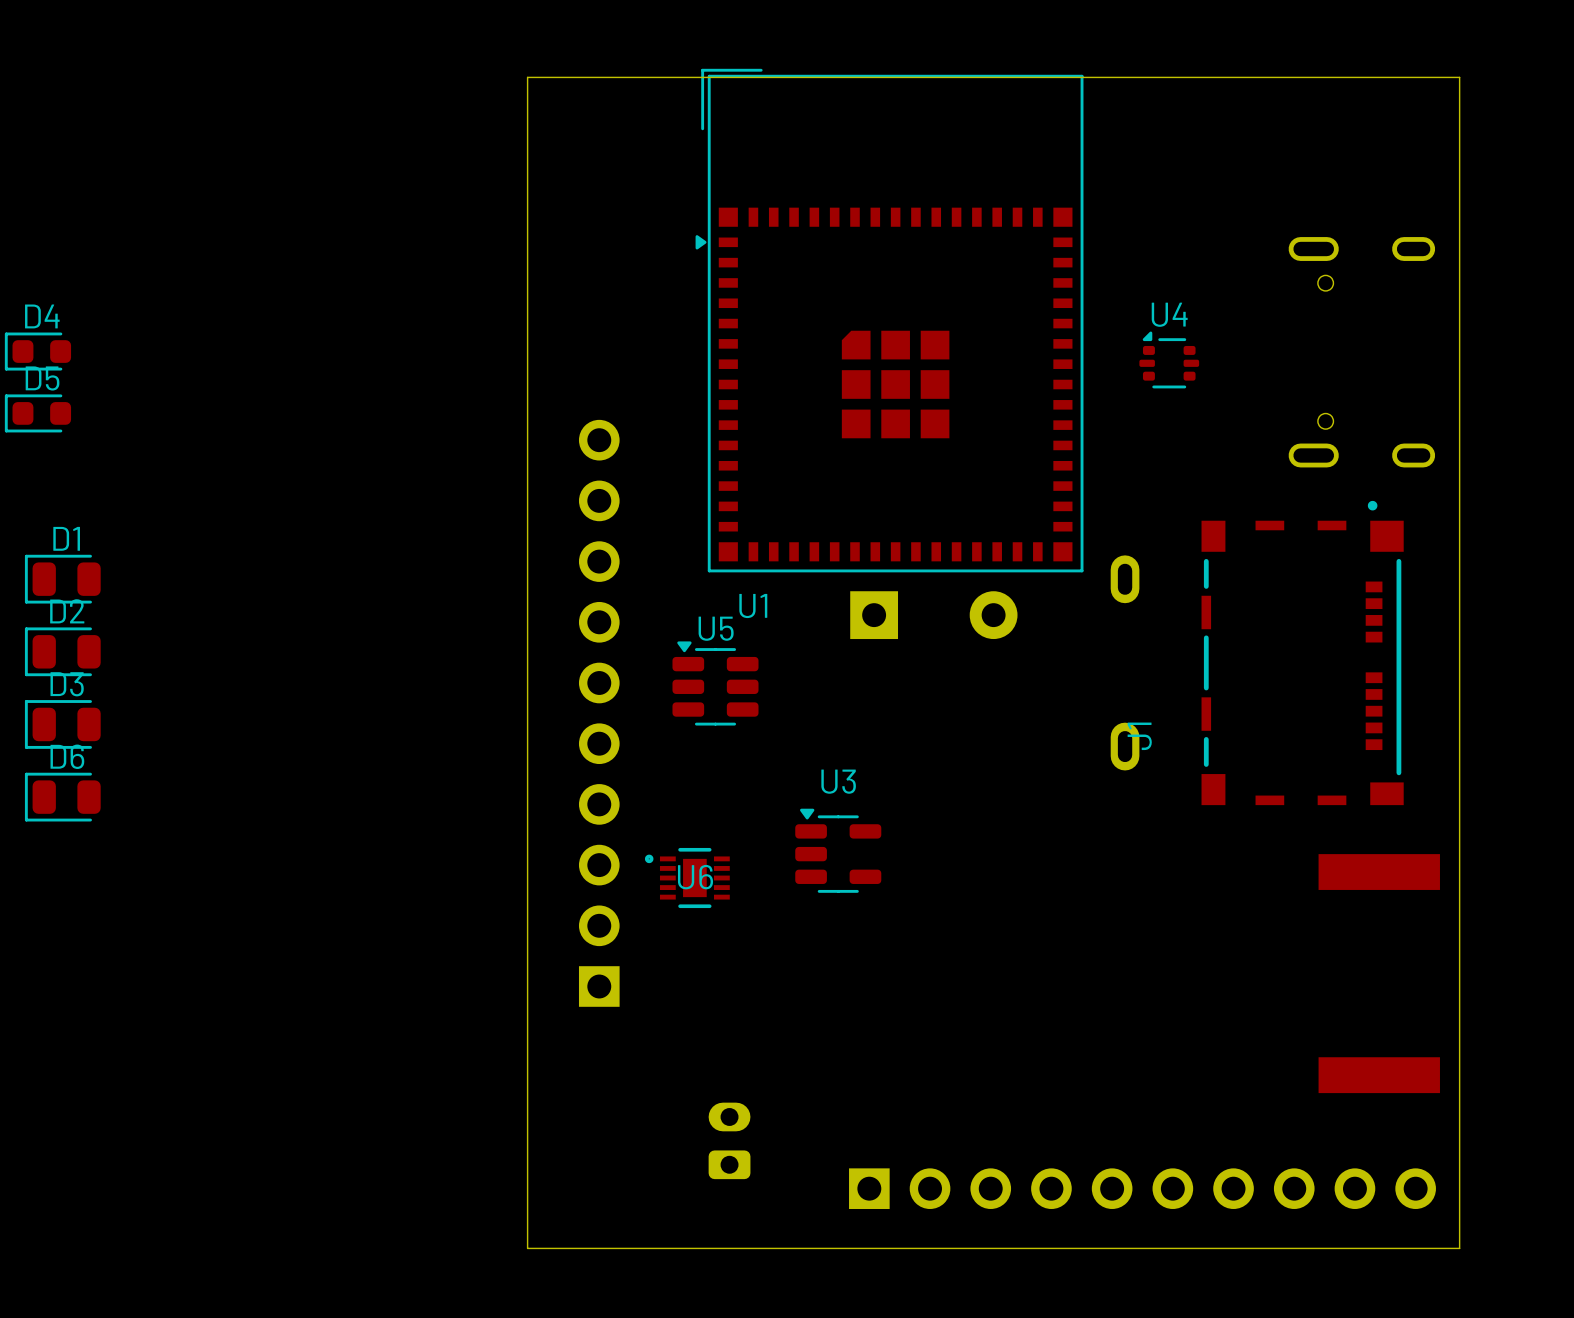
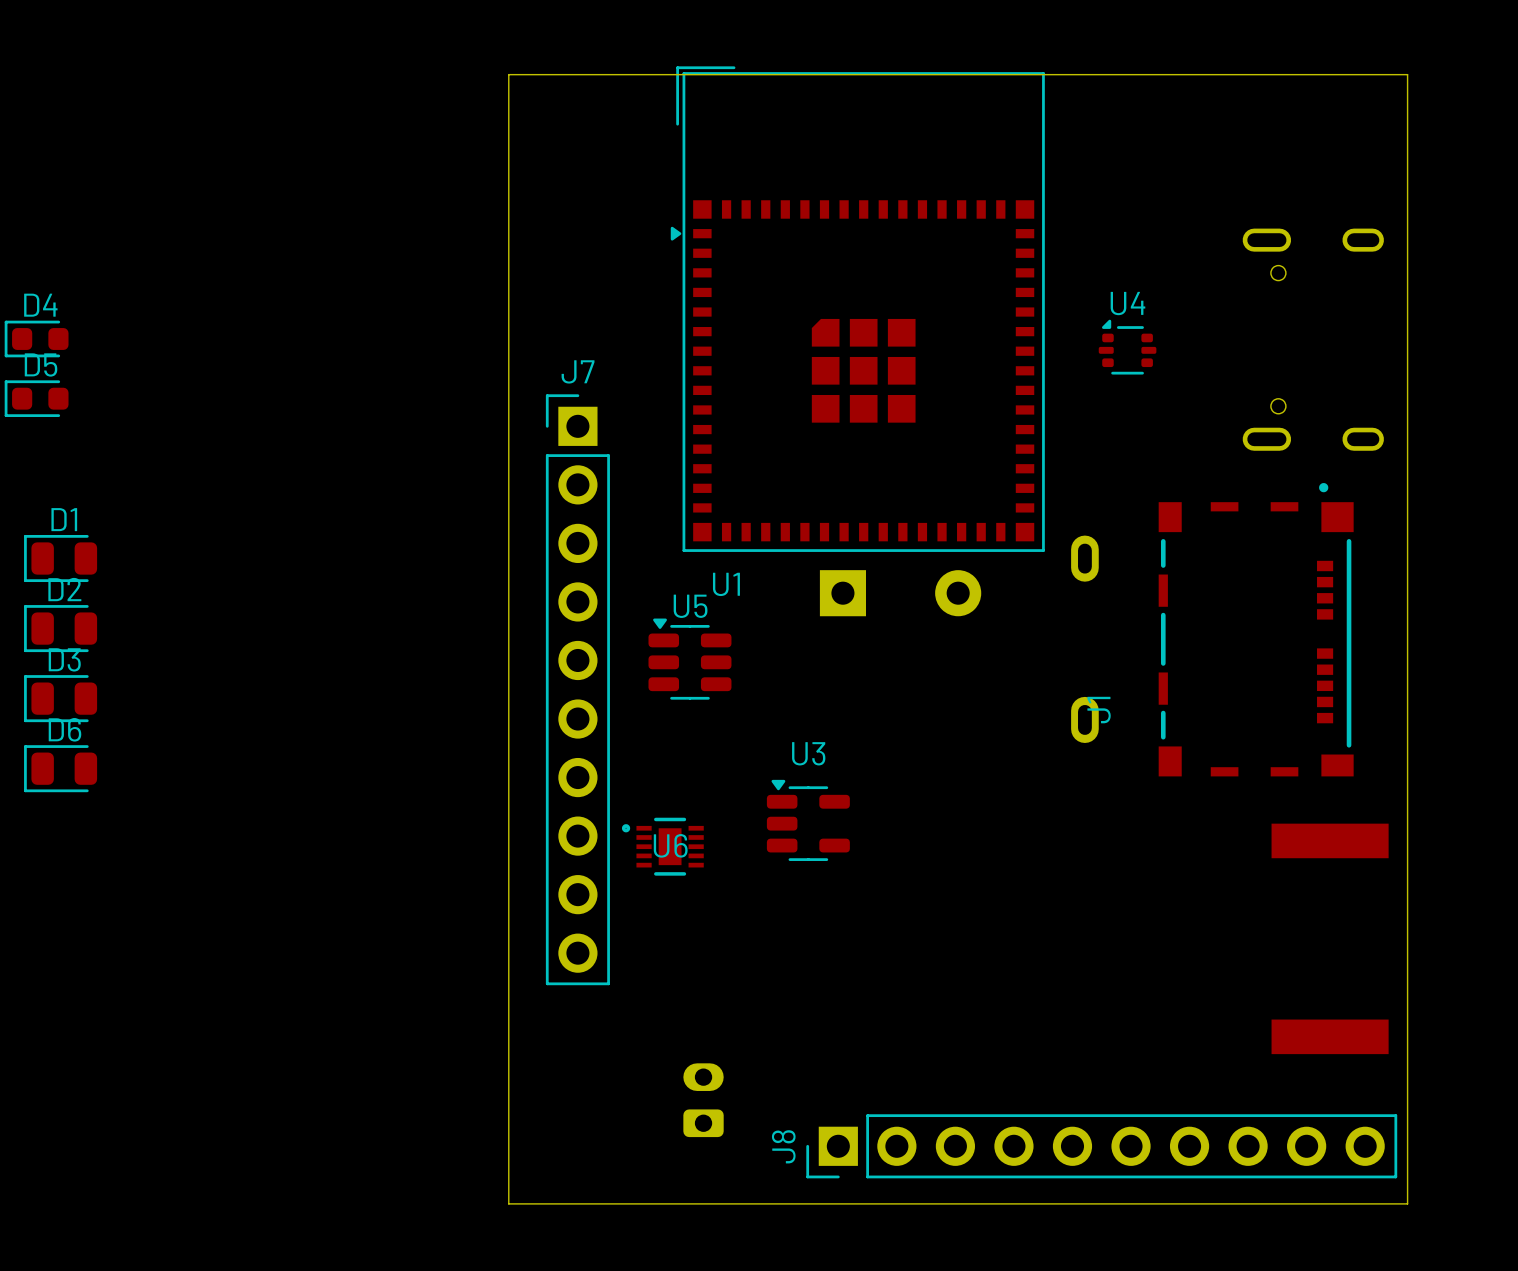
J7 side: bottom (599, 713) -> top (577, 689)
J8 side: bottom (1142, 1188) -> top (1101, 1146)

